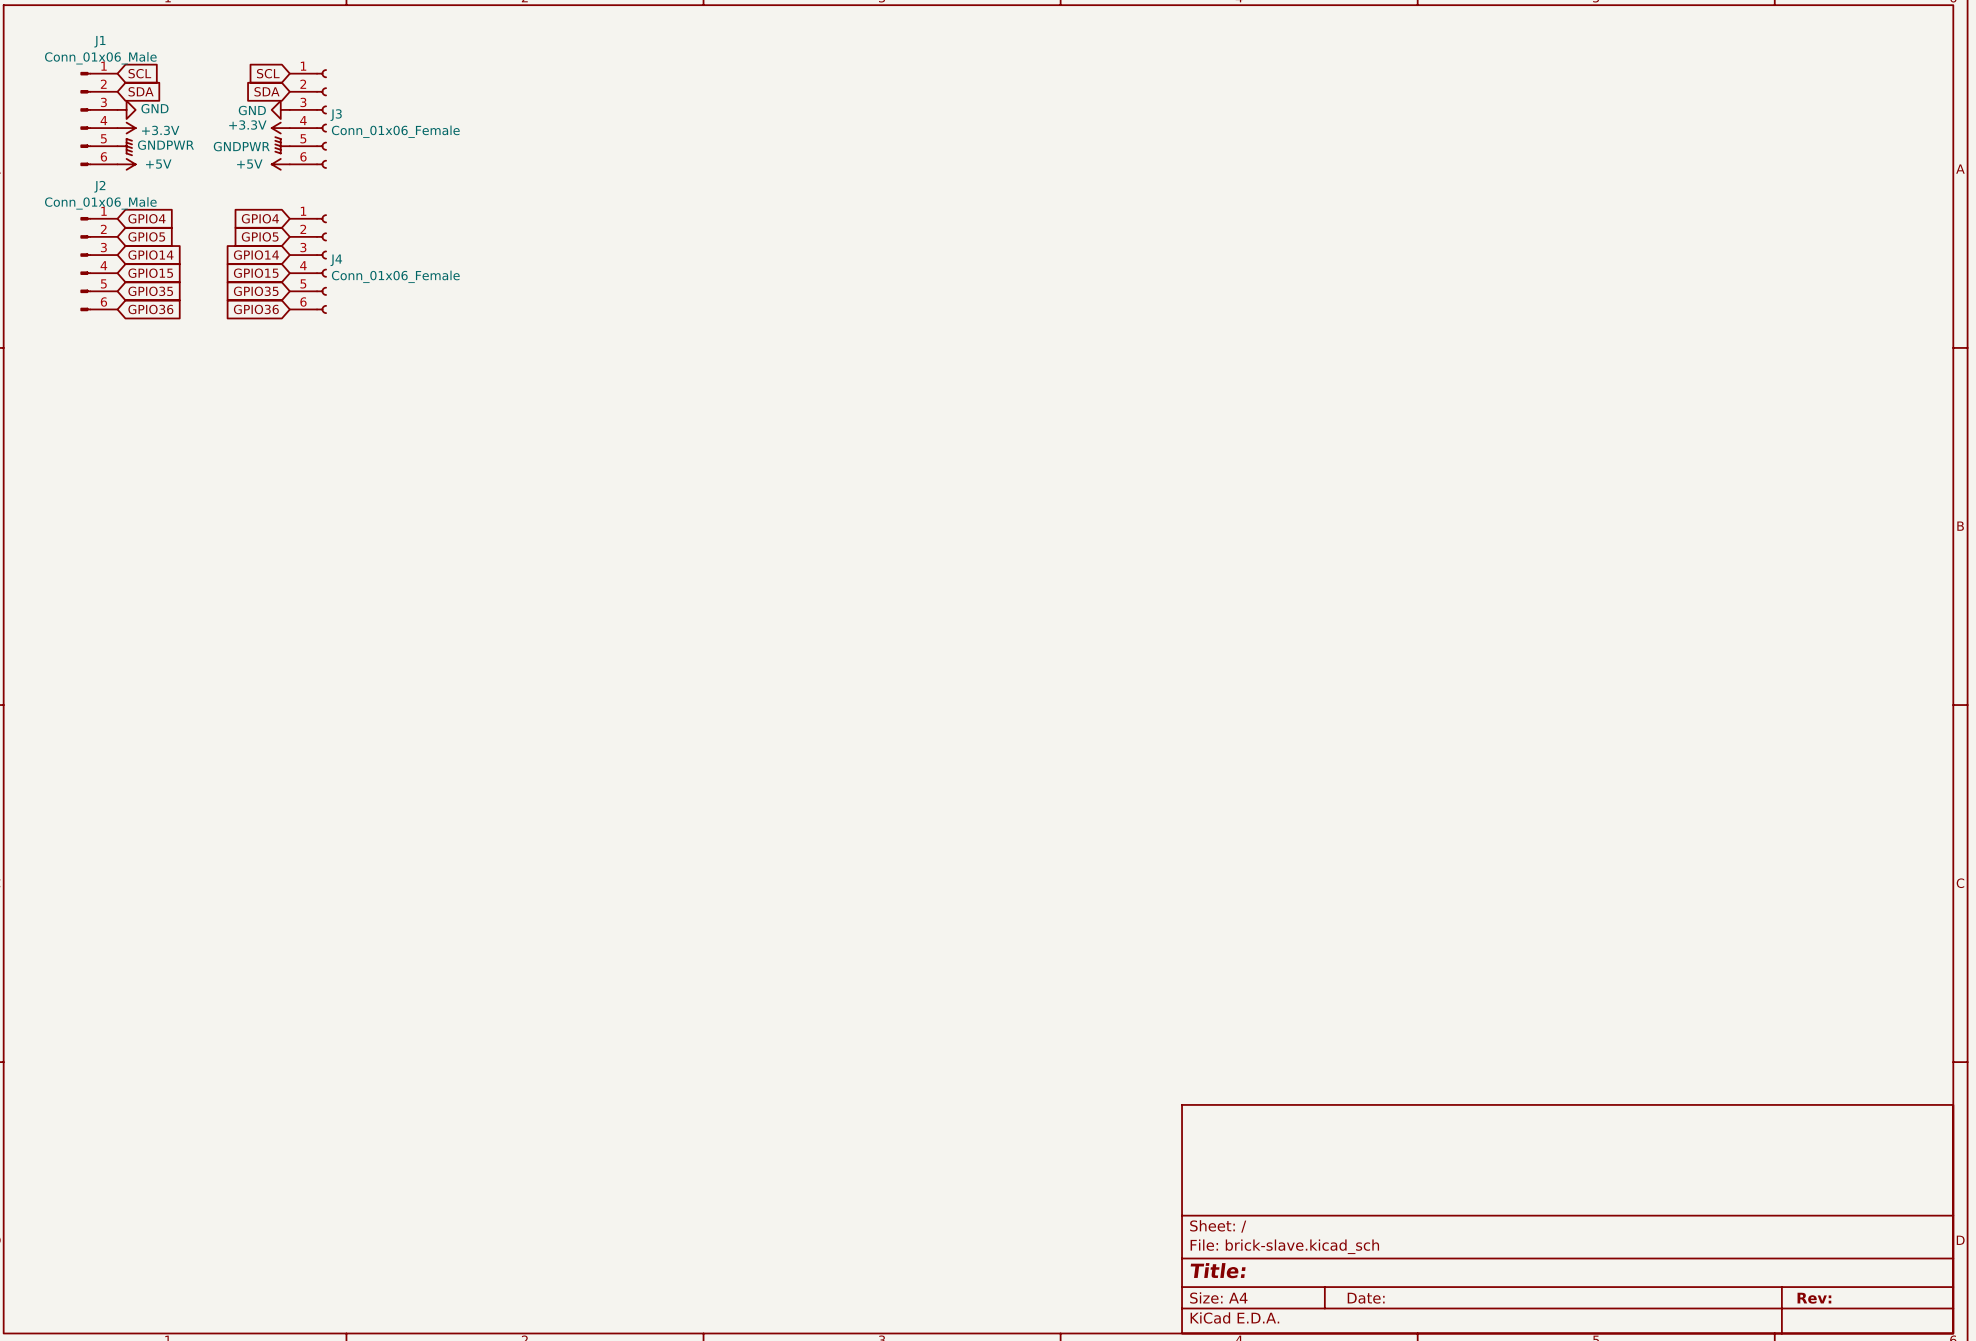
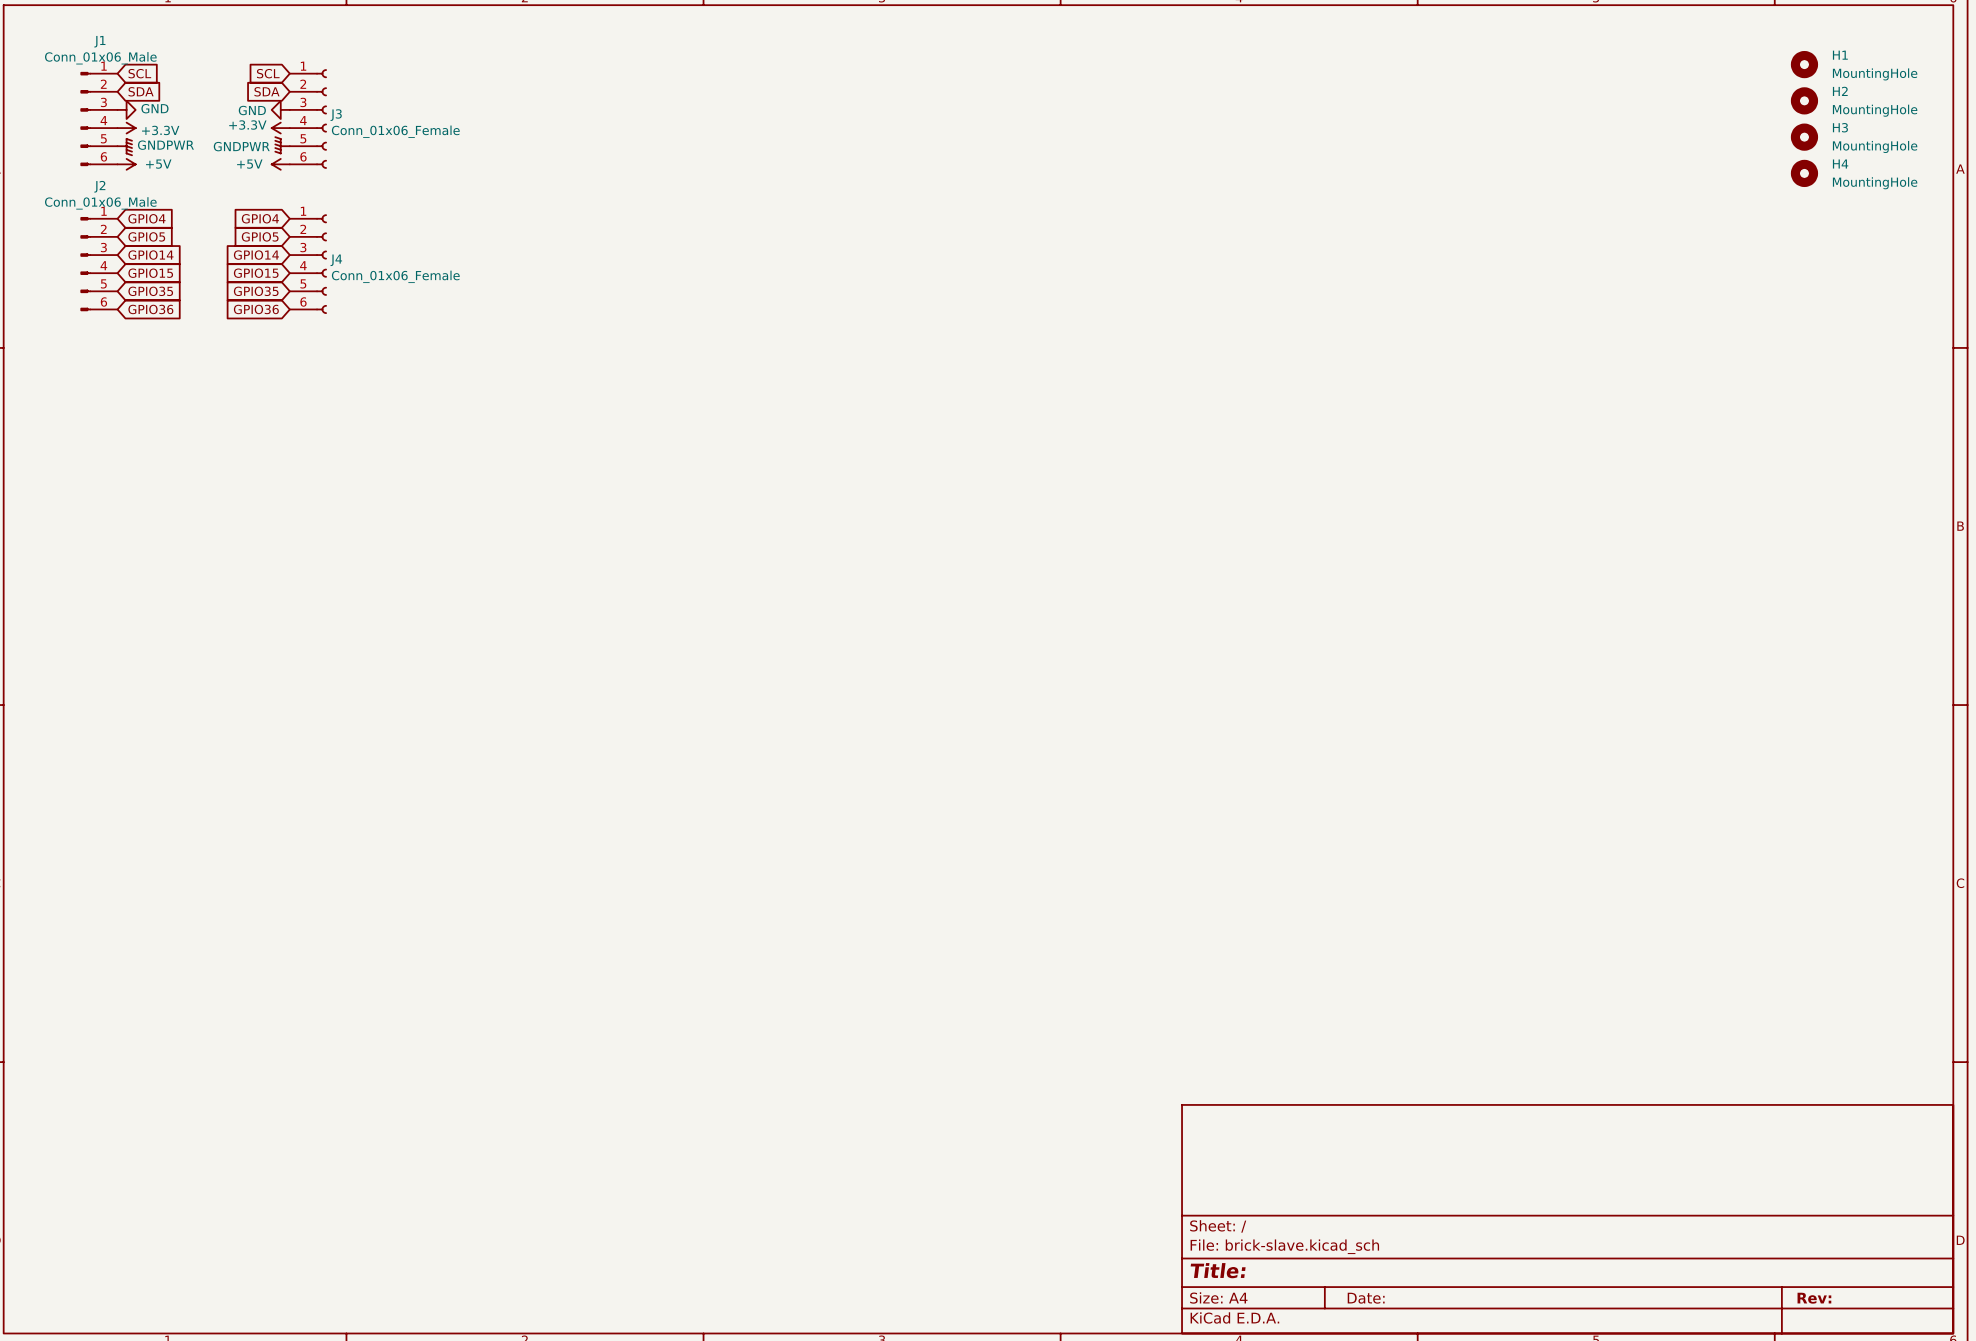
H1: none -> MountingHole (1804, 64)
H2: none -> MountingHole (1804, 100)
H3: none -> MountingHole (1804, 137)
H4: none -> MountingHole (1804, 173)

